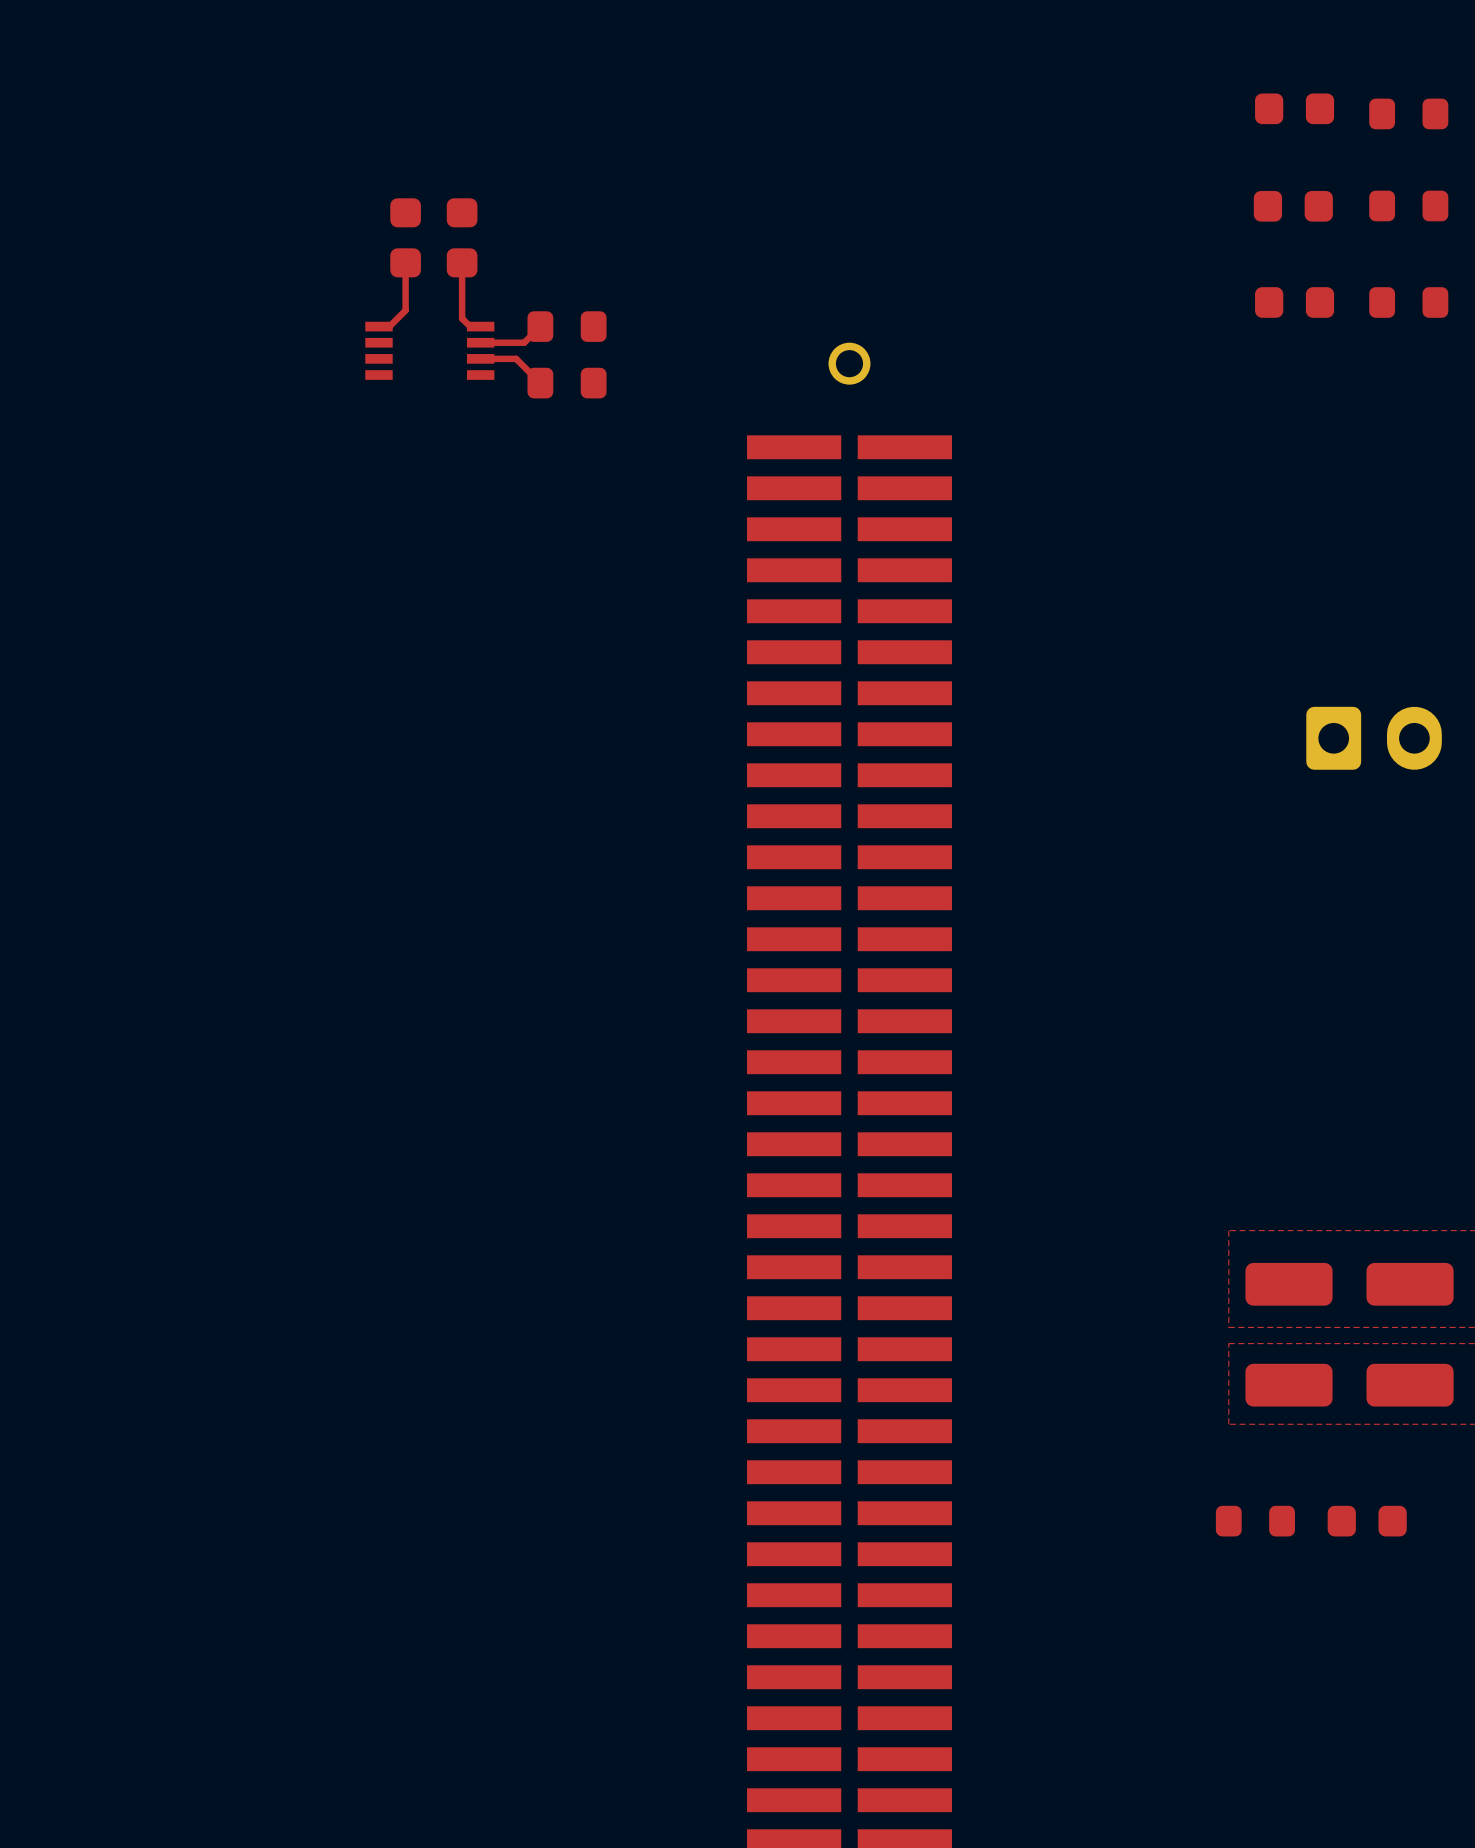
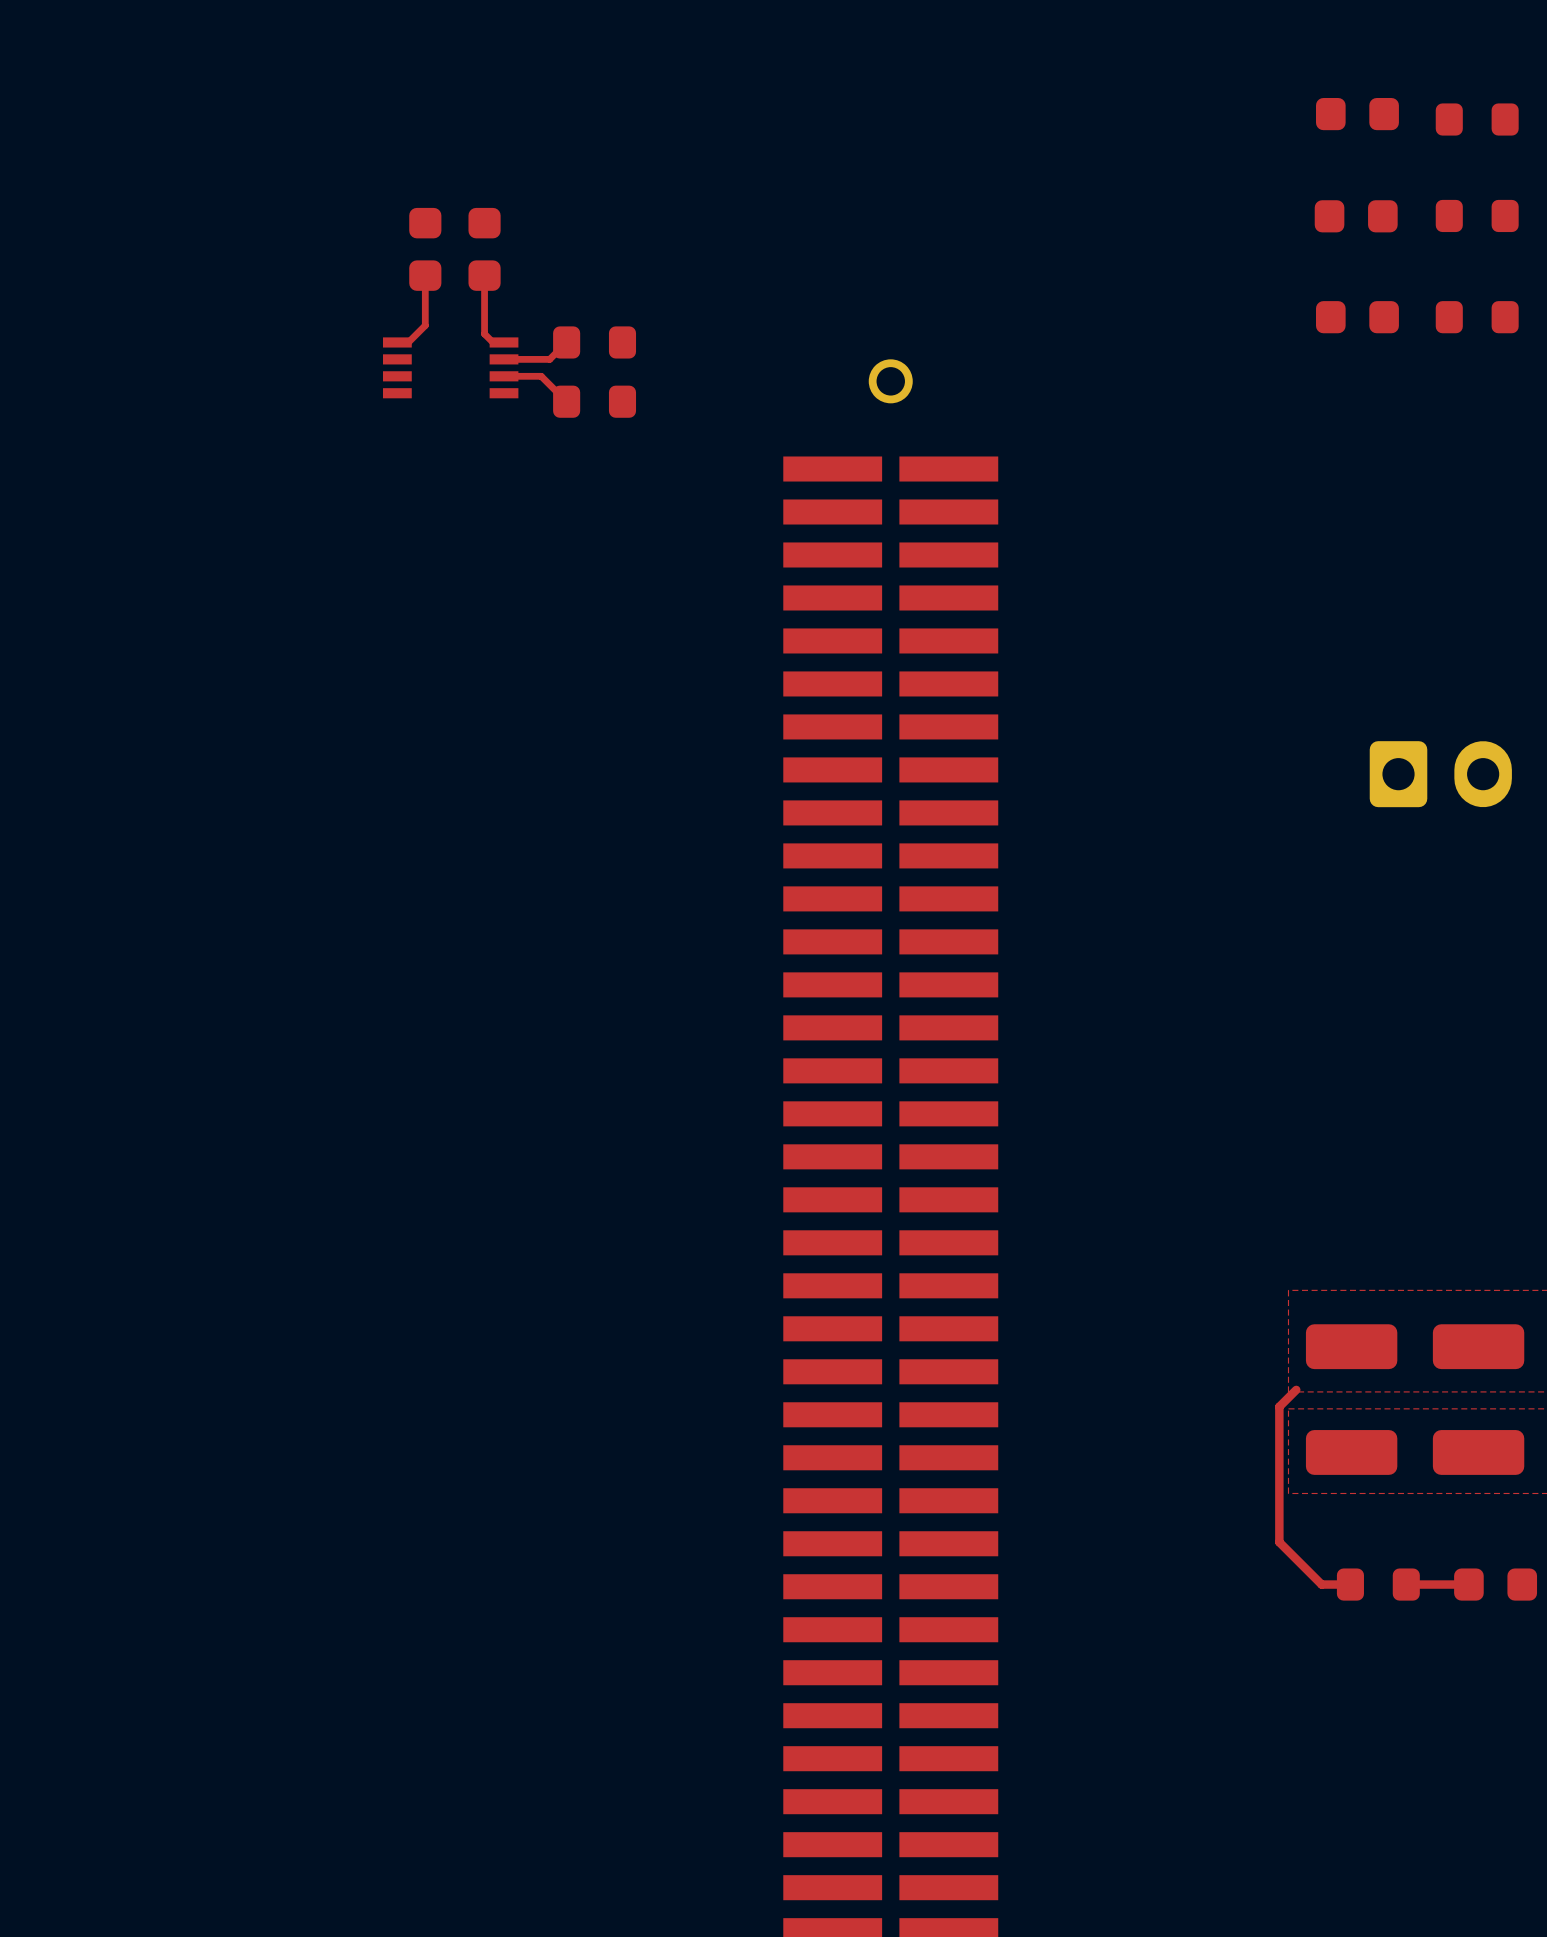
top track: none -> (1296, 1389) (1279, 1406) (1279, 1542) (1321, 1584) (1350, 1584)
top track: none -> (1468, 1584) (1406, 1584)
part position: (1255, 1521) -> (1378, 1584)
part position: (1367, 1521) -> (1495, 1584)

